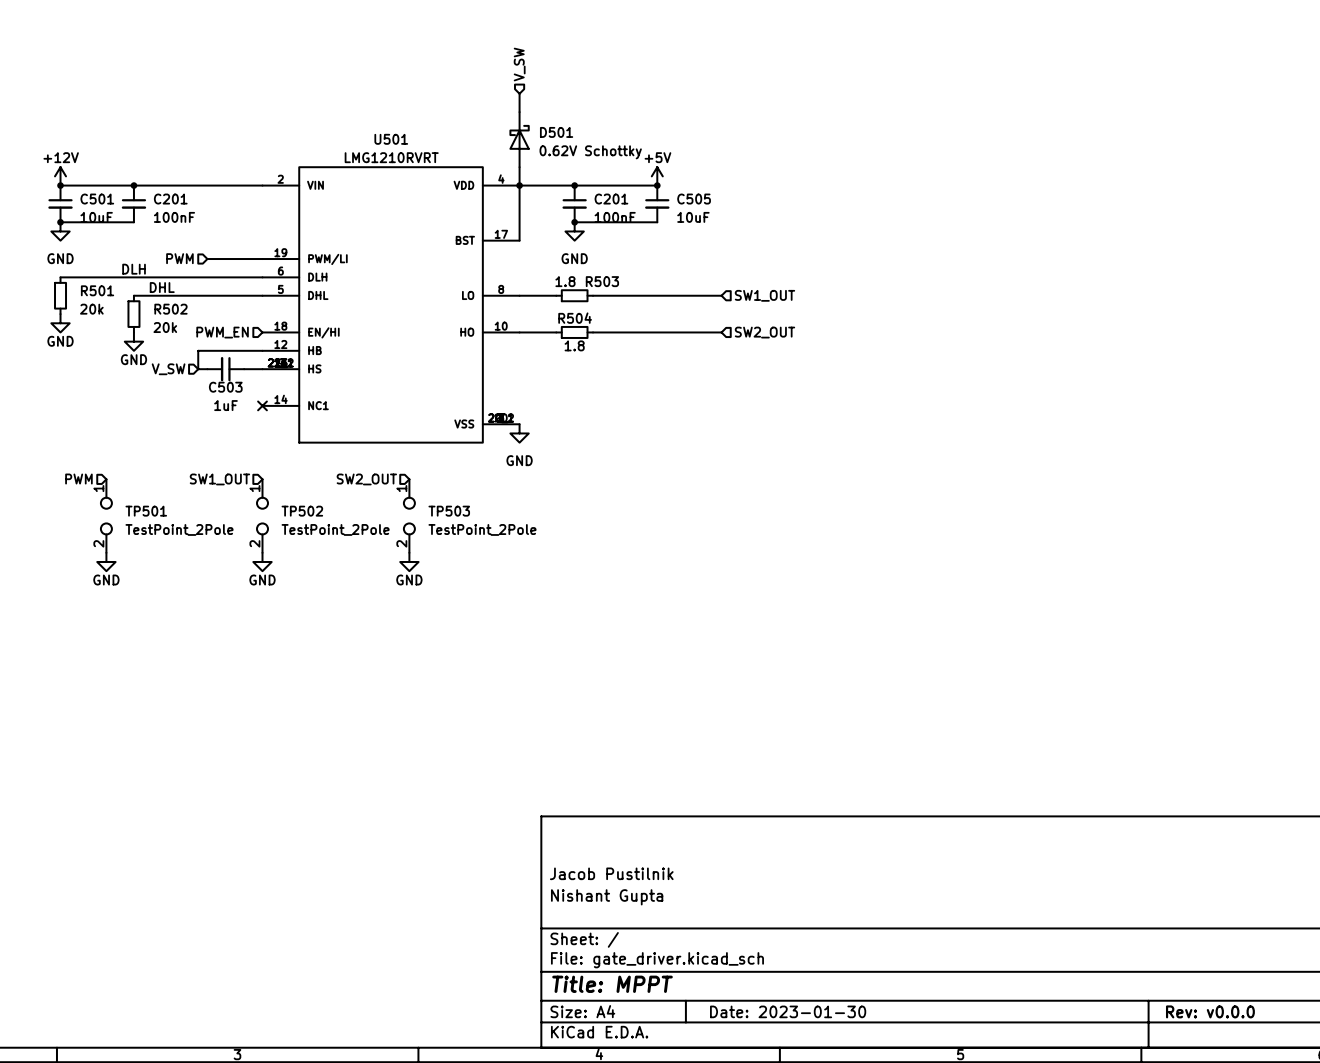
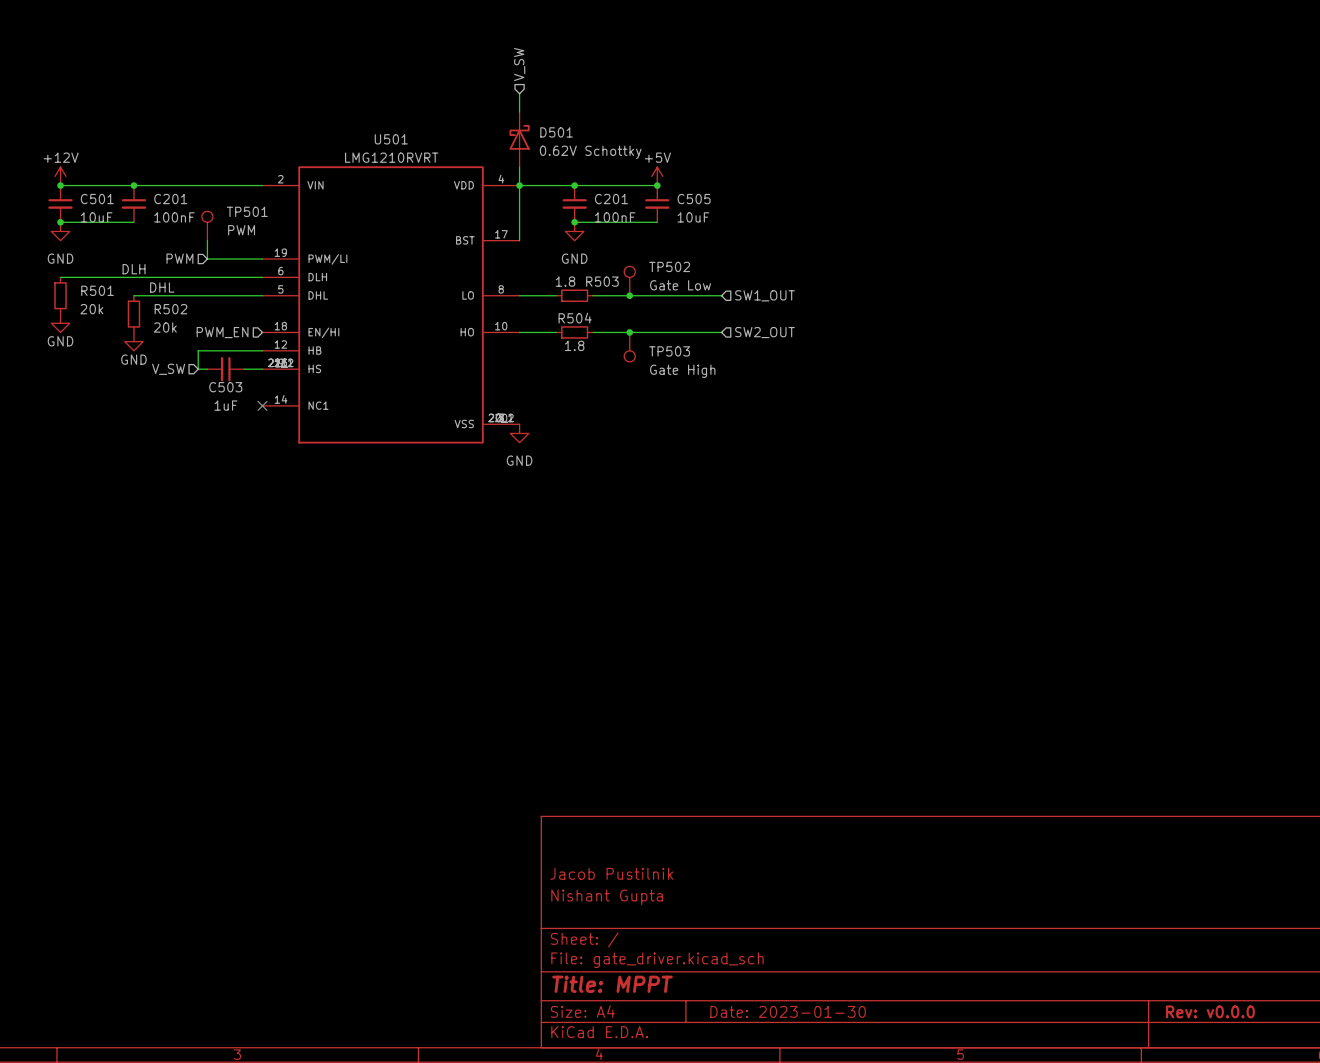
wire: none -> (207, 240) (207, 259)
junction: none -> (629, 295)
junction: none -> (629, 332)
hierarchical label: PWM (78, 479) -> none
TP501 symbol: [100, 479, 112, 553] -> [201, 211, 213, 241]
hierarchical label: SW1_OUT (219, 479) -> none
TP502 symbol: [256, 479, 269, 553] -> [624, 266, 636, 296]
hierarchical label: SW2_OUT (366, 479) -> none
TP503 symbol: [403, 479, 415, 553] -> [624, 332, 636, 362]
TP501 value: TestPoint_2Pole (179, 529) -> PWM (241, 230)
TP502 value: TestPoint_2Pole (335, 529) -> Gate Low (680, 285)
TP503 value: TestPoint_2Pole (482, 529) -> Gate High (682, 371)
power symbol: GND (106, 561) -> none
power symbol: GND (262, 561) -> none
power symbol: GND (409, 561) -> none

